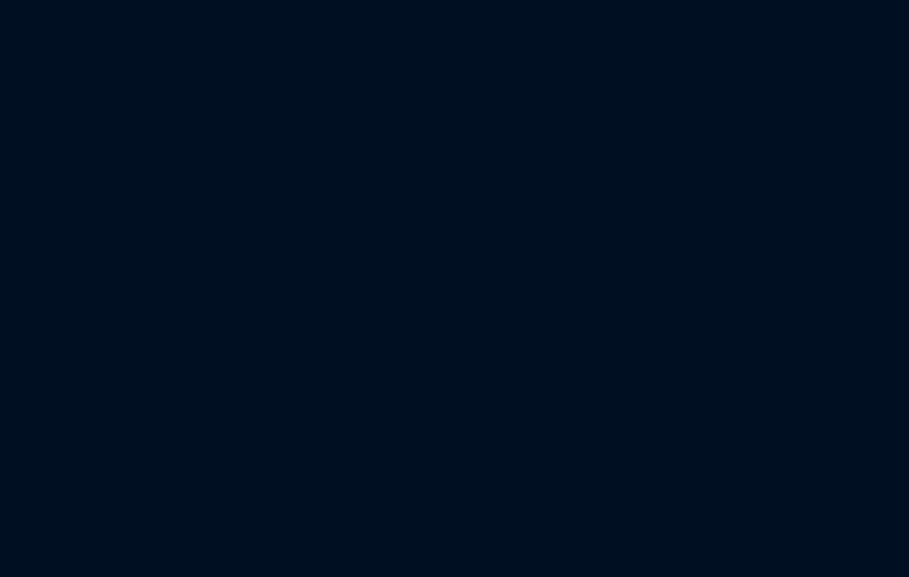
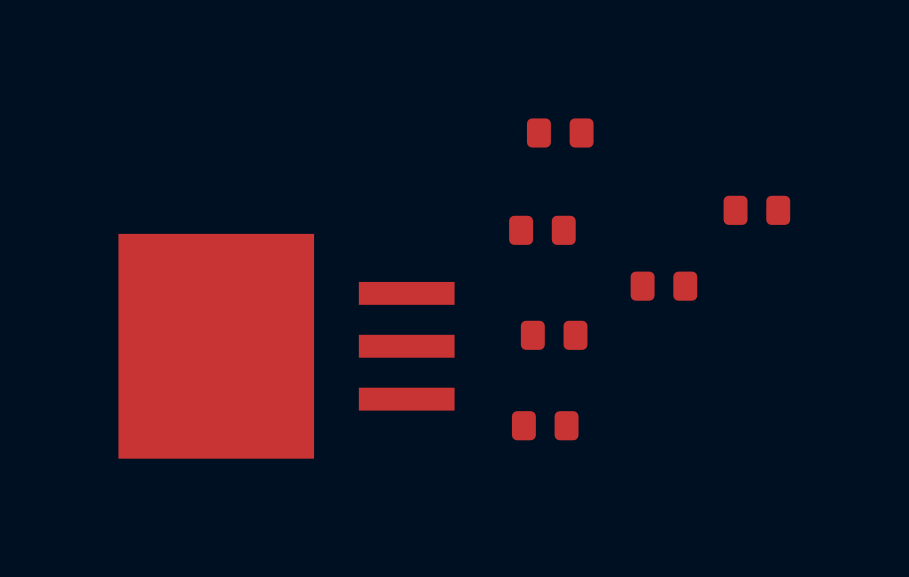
part: none -> (560, 132)
part: none -> (756, 210)
part: none -> (542, 230)
part: none -> (663, 286)
part: none -> (554, 335)
part: none -> (286, 346)
part: none -> (545, 425)

